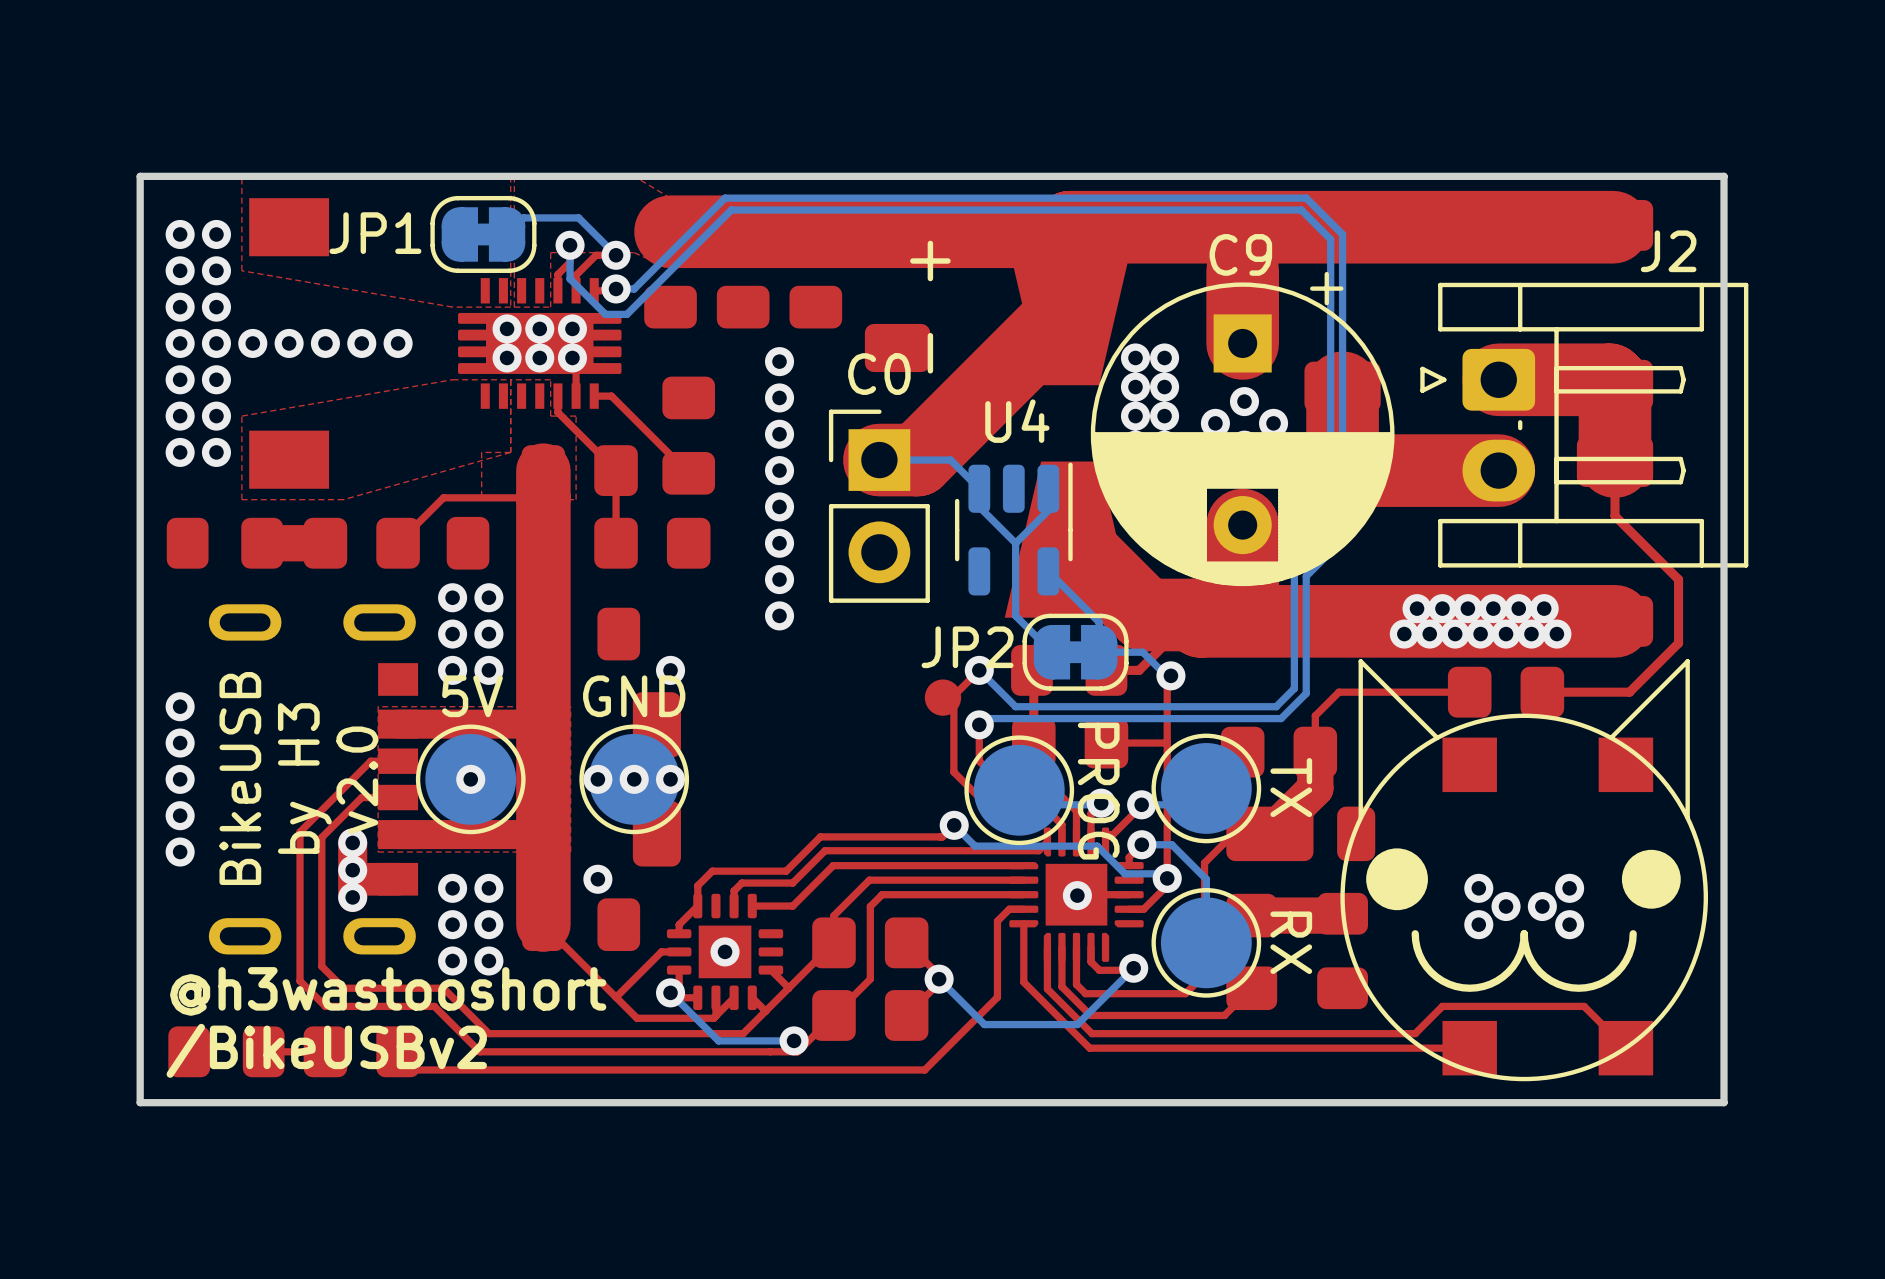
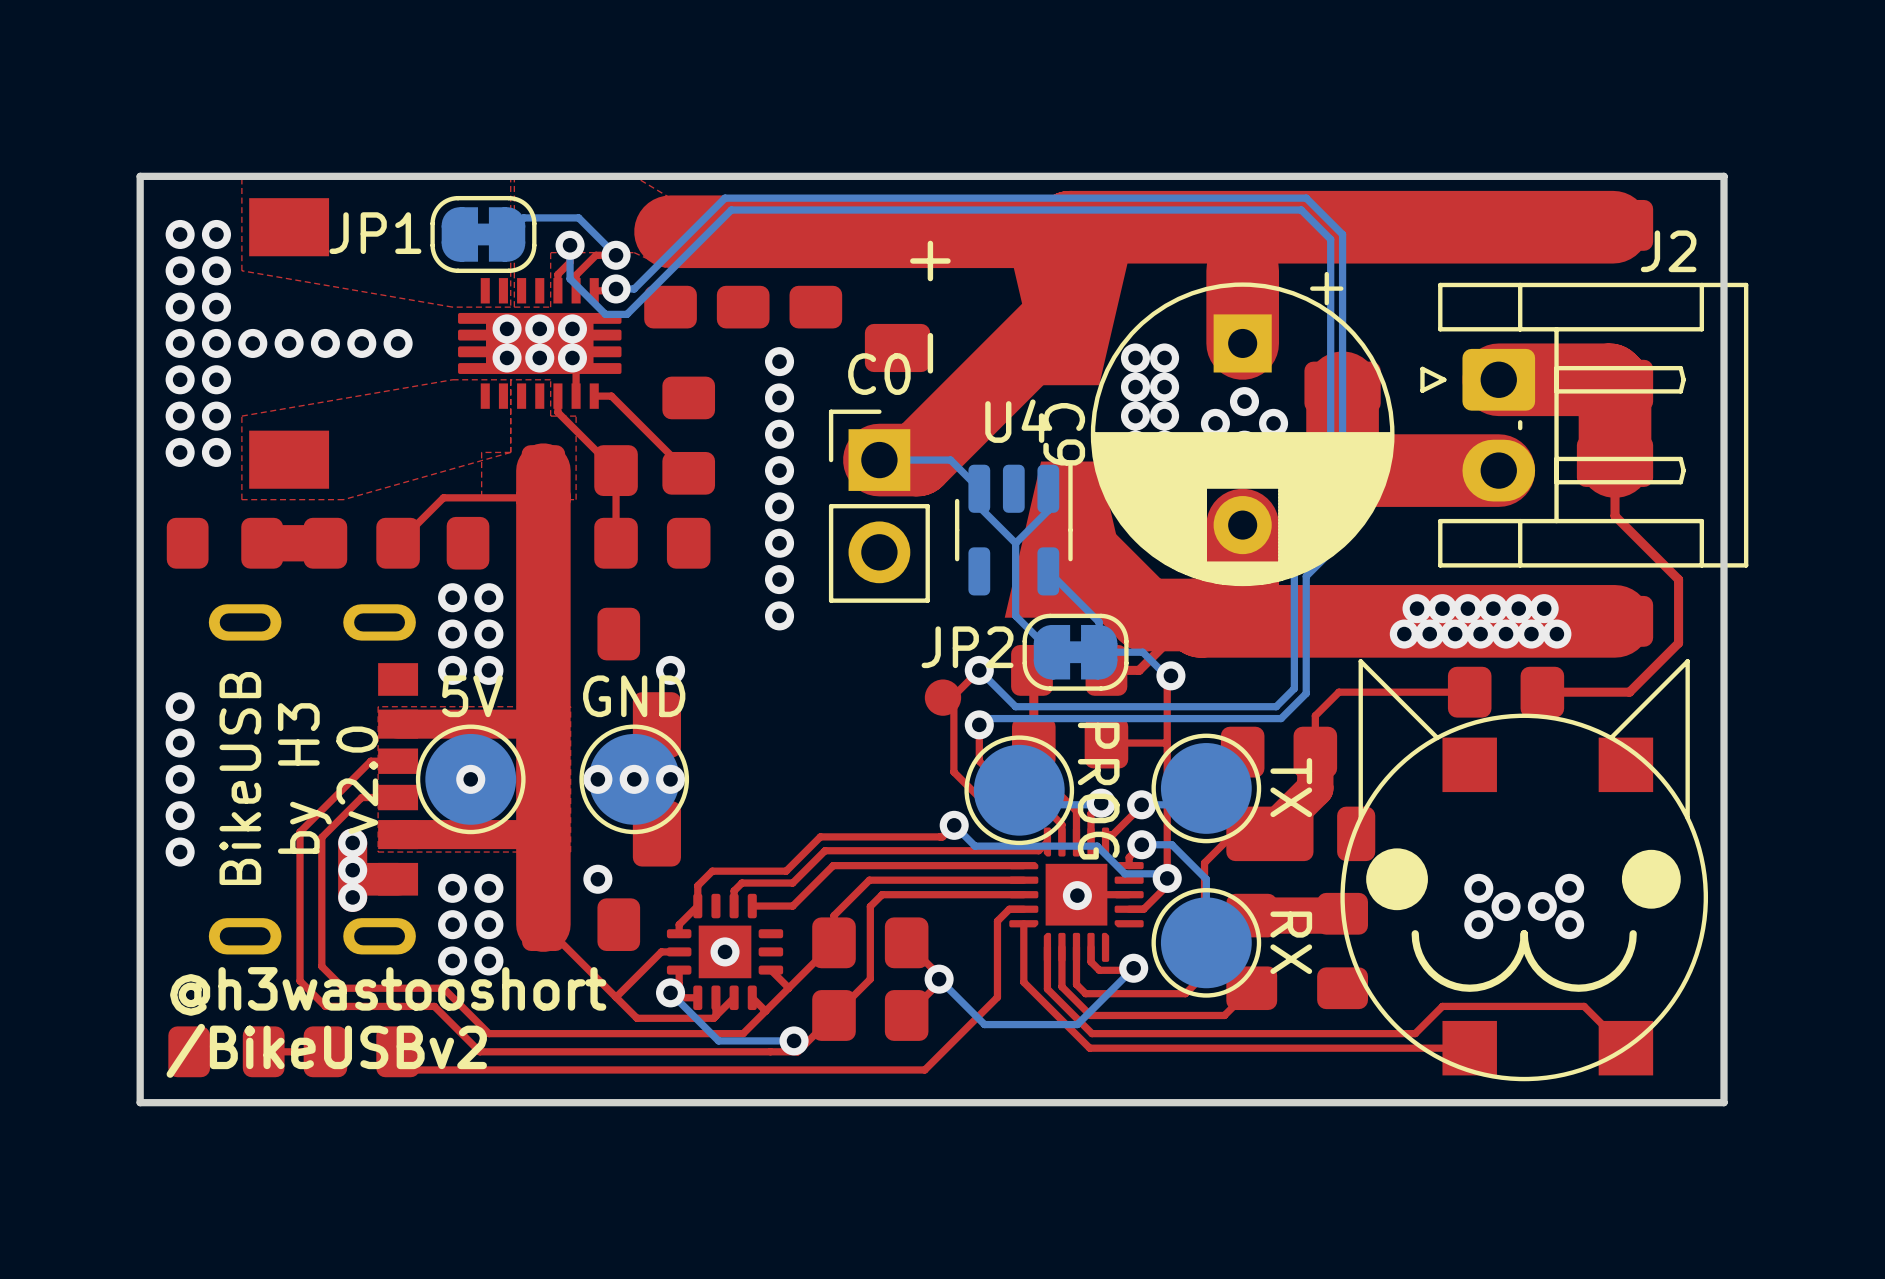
C9 name rotation: 0° (1240, 254) -> 90° clockwise (1064, 434)
C9 name position: C9 (1240, 254) -> C9 (1064, 434)

